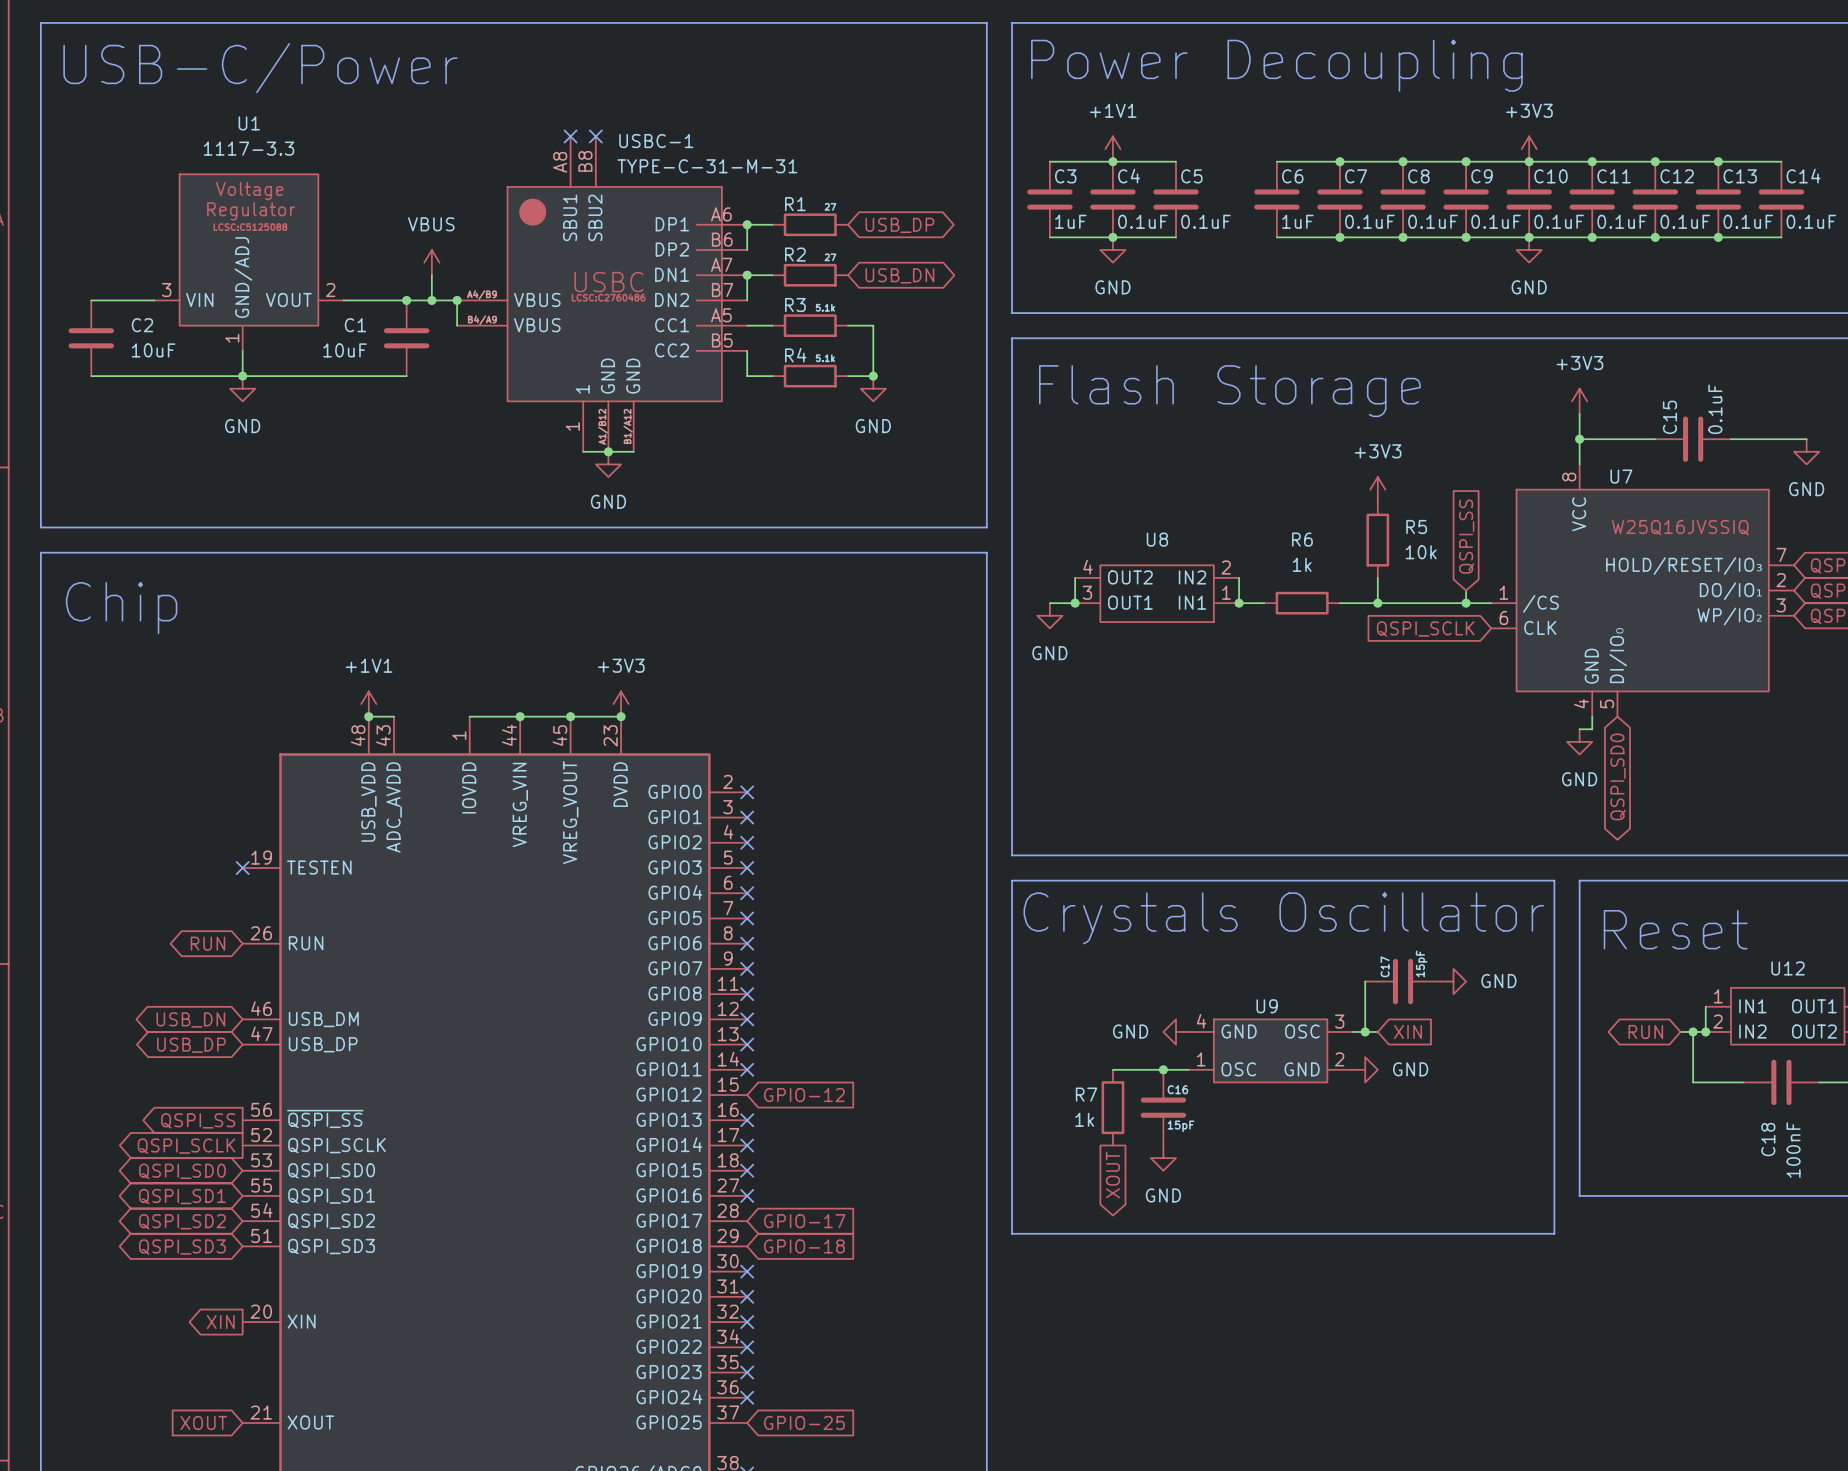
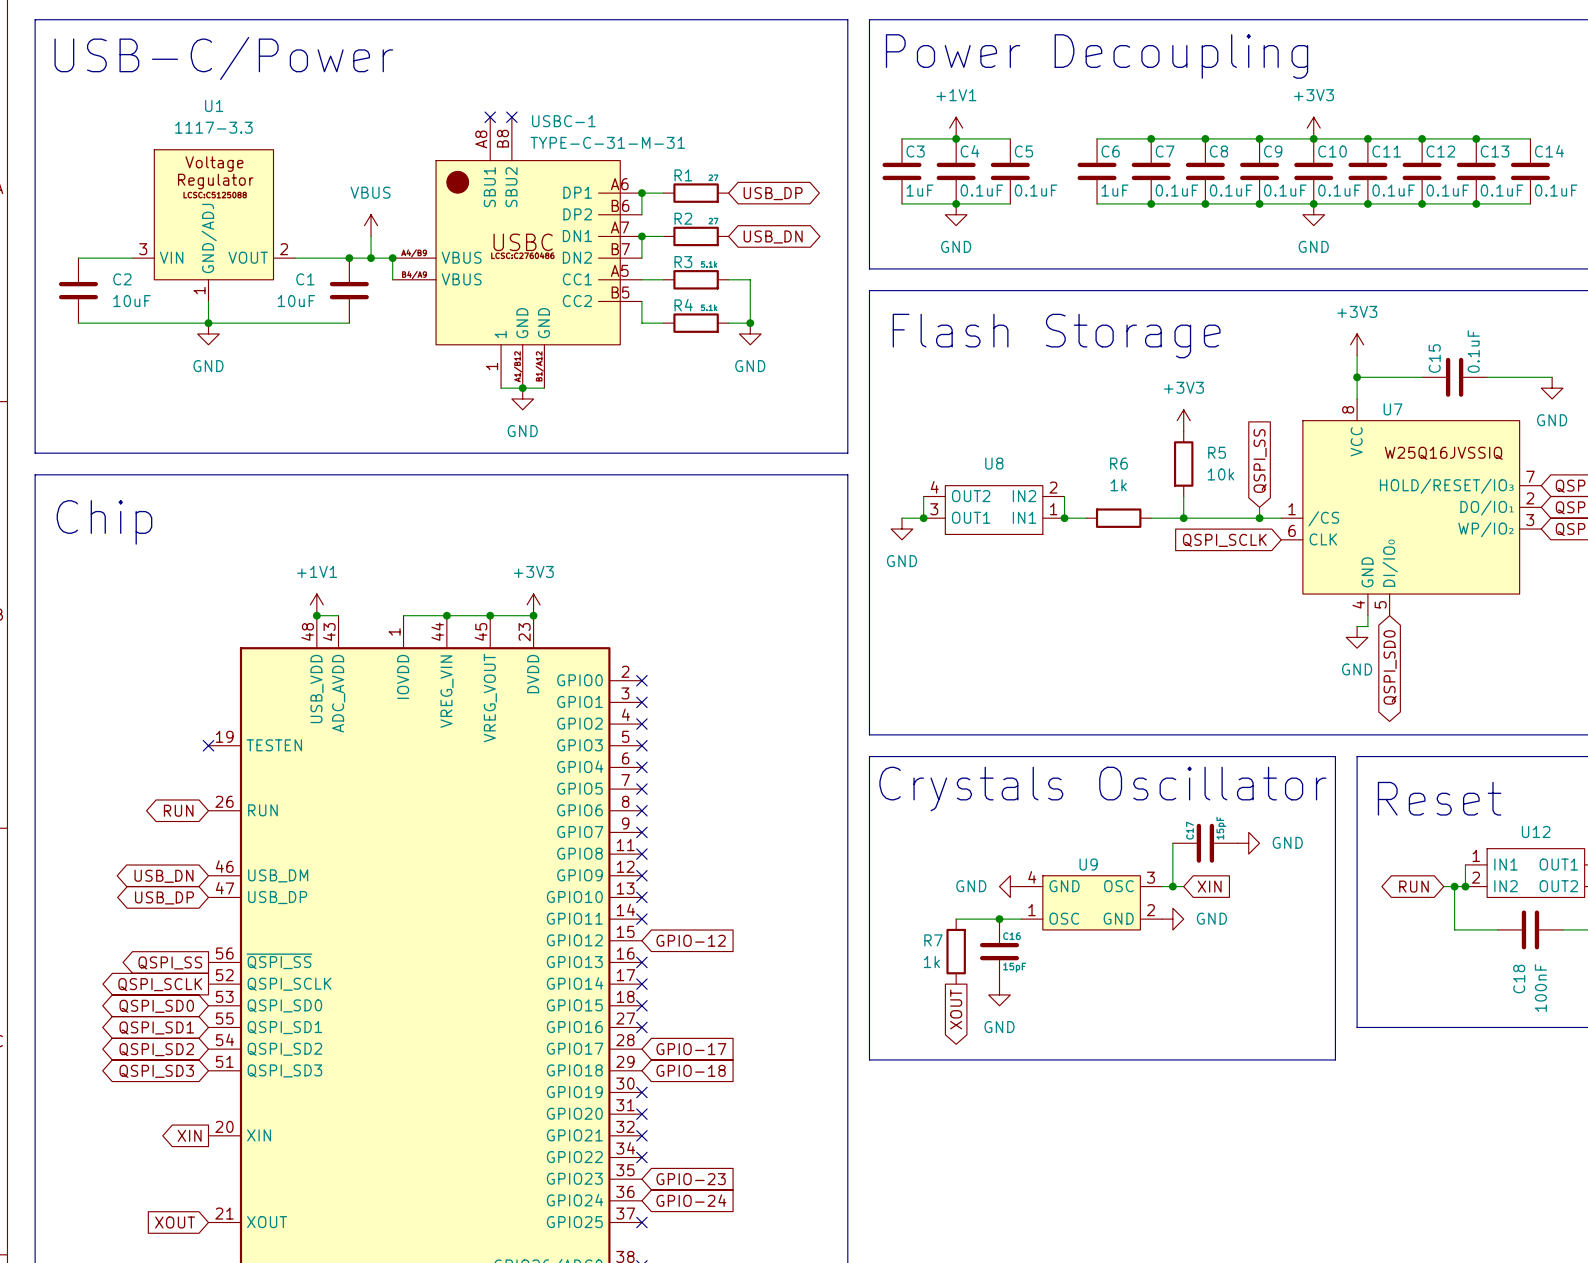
no-connect mark: (747, 1372) -> none
global label: none -> GPIO-23 (691, 1179)
no-connect mark: (747, 1397) -> none
no-connect mark: none -> (641, 1222)
global label: GPIO-25 (804, 1422) -> GPIO-24 (691, 1200)

